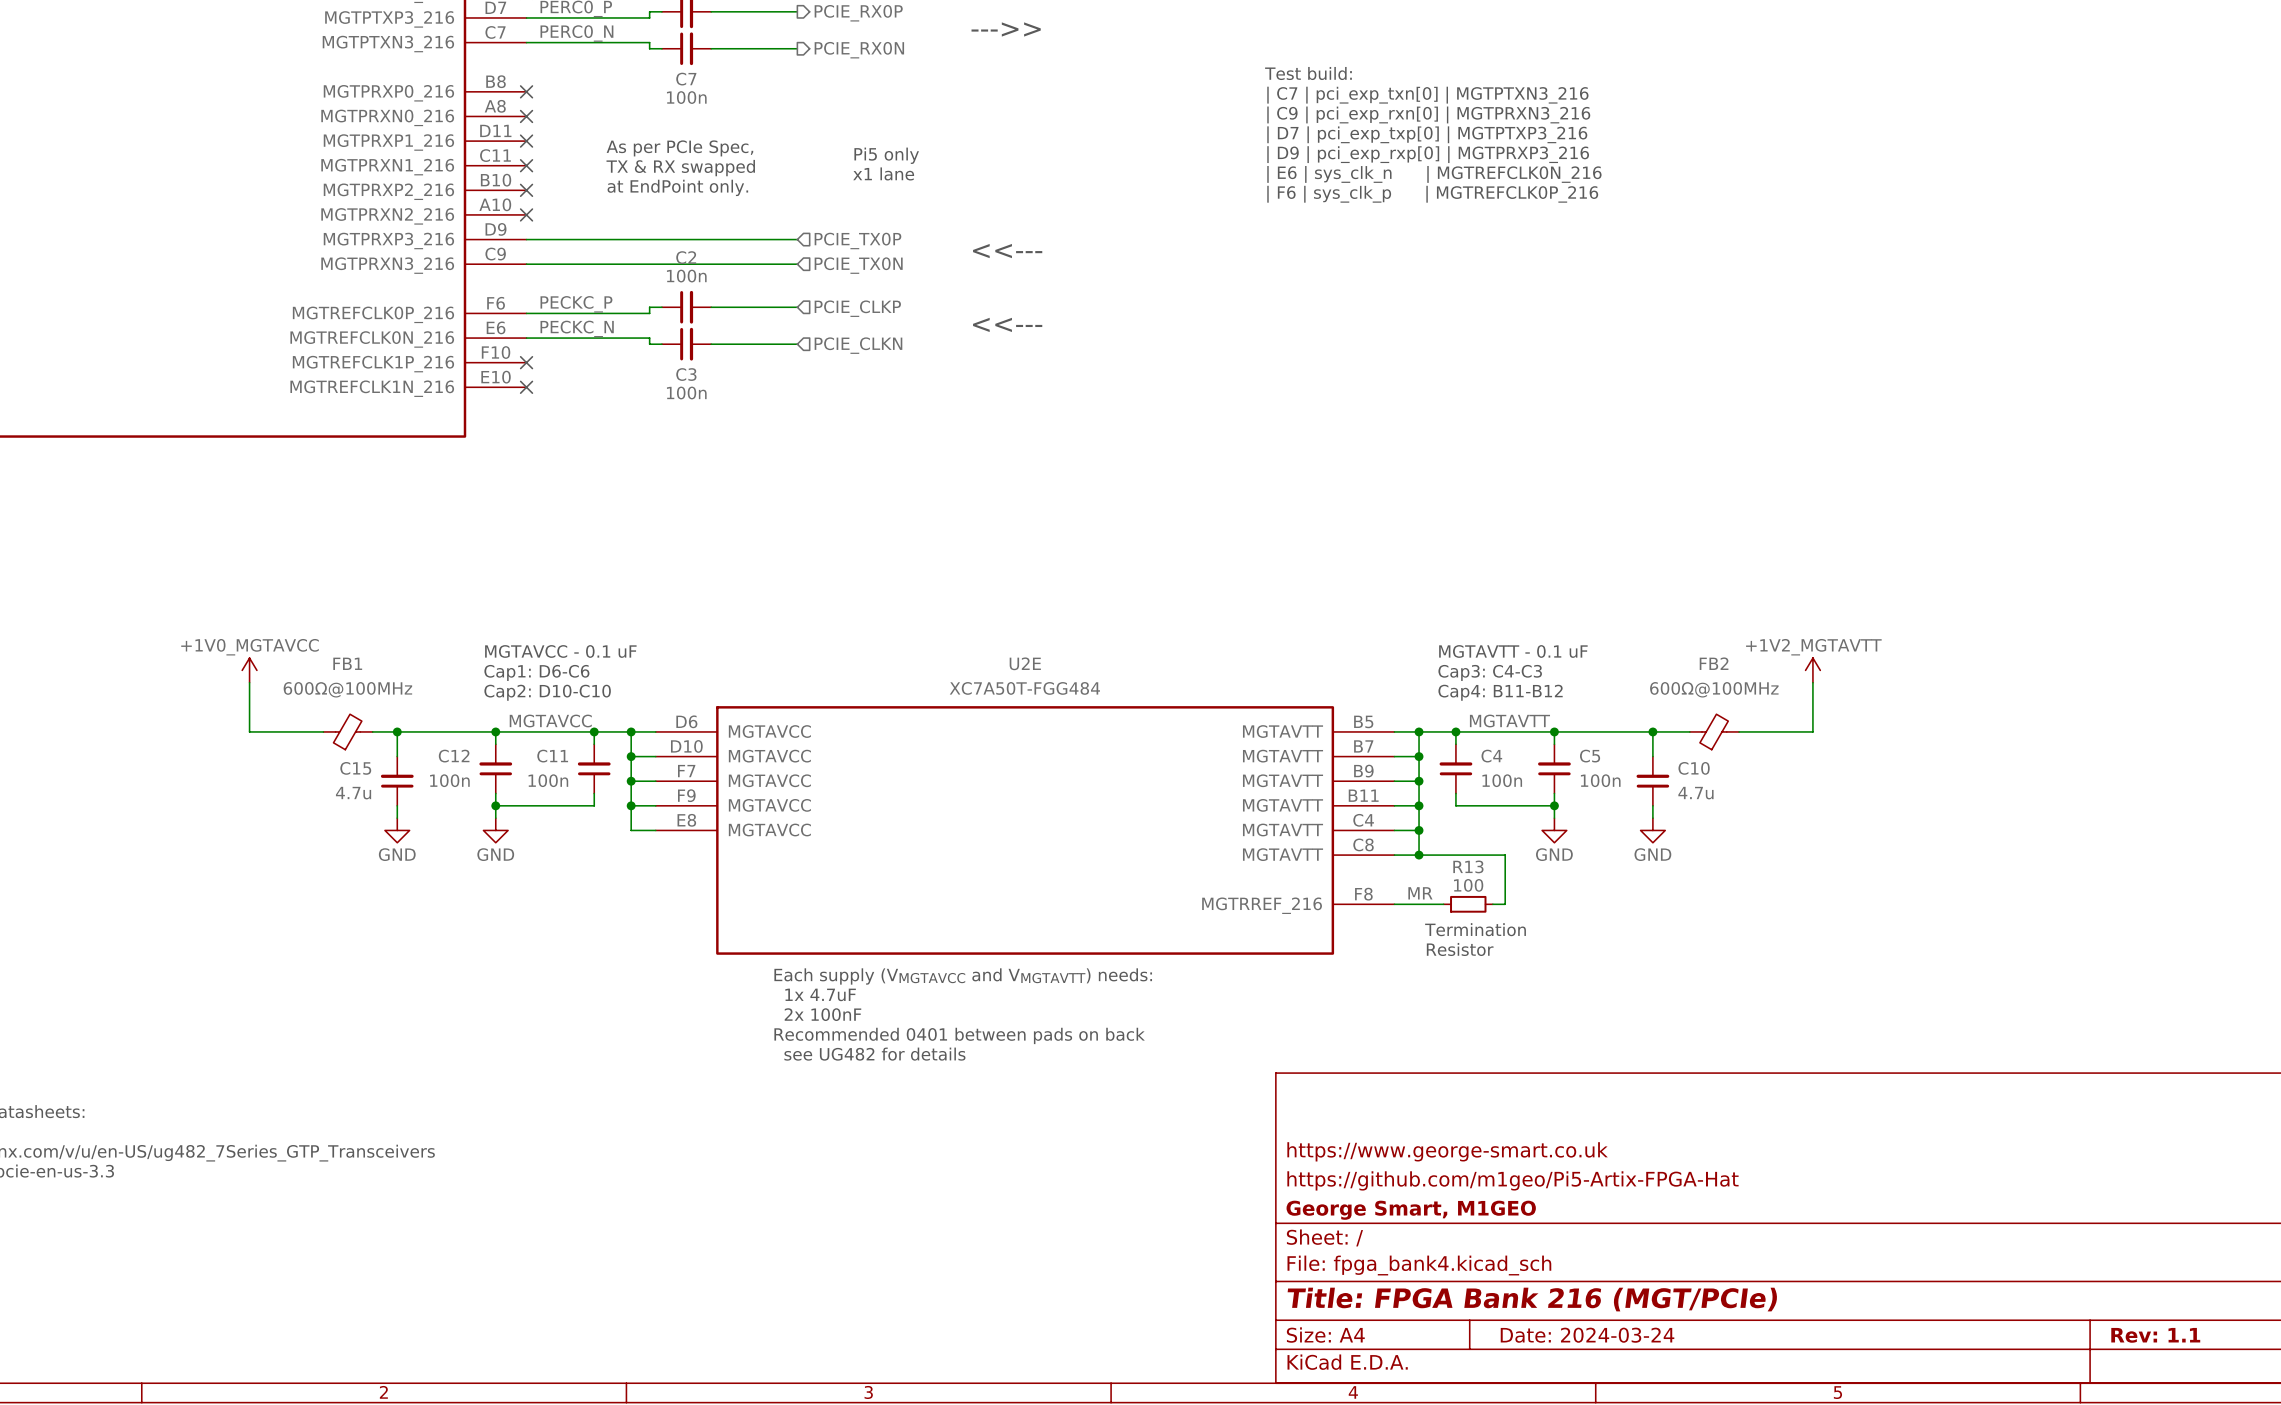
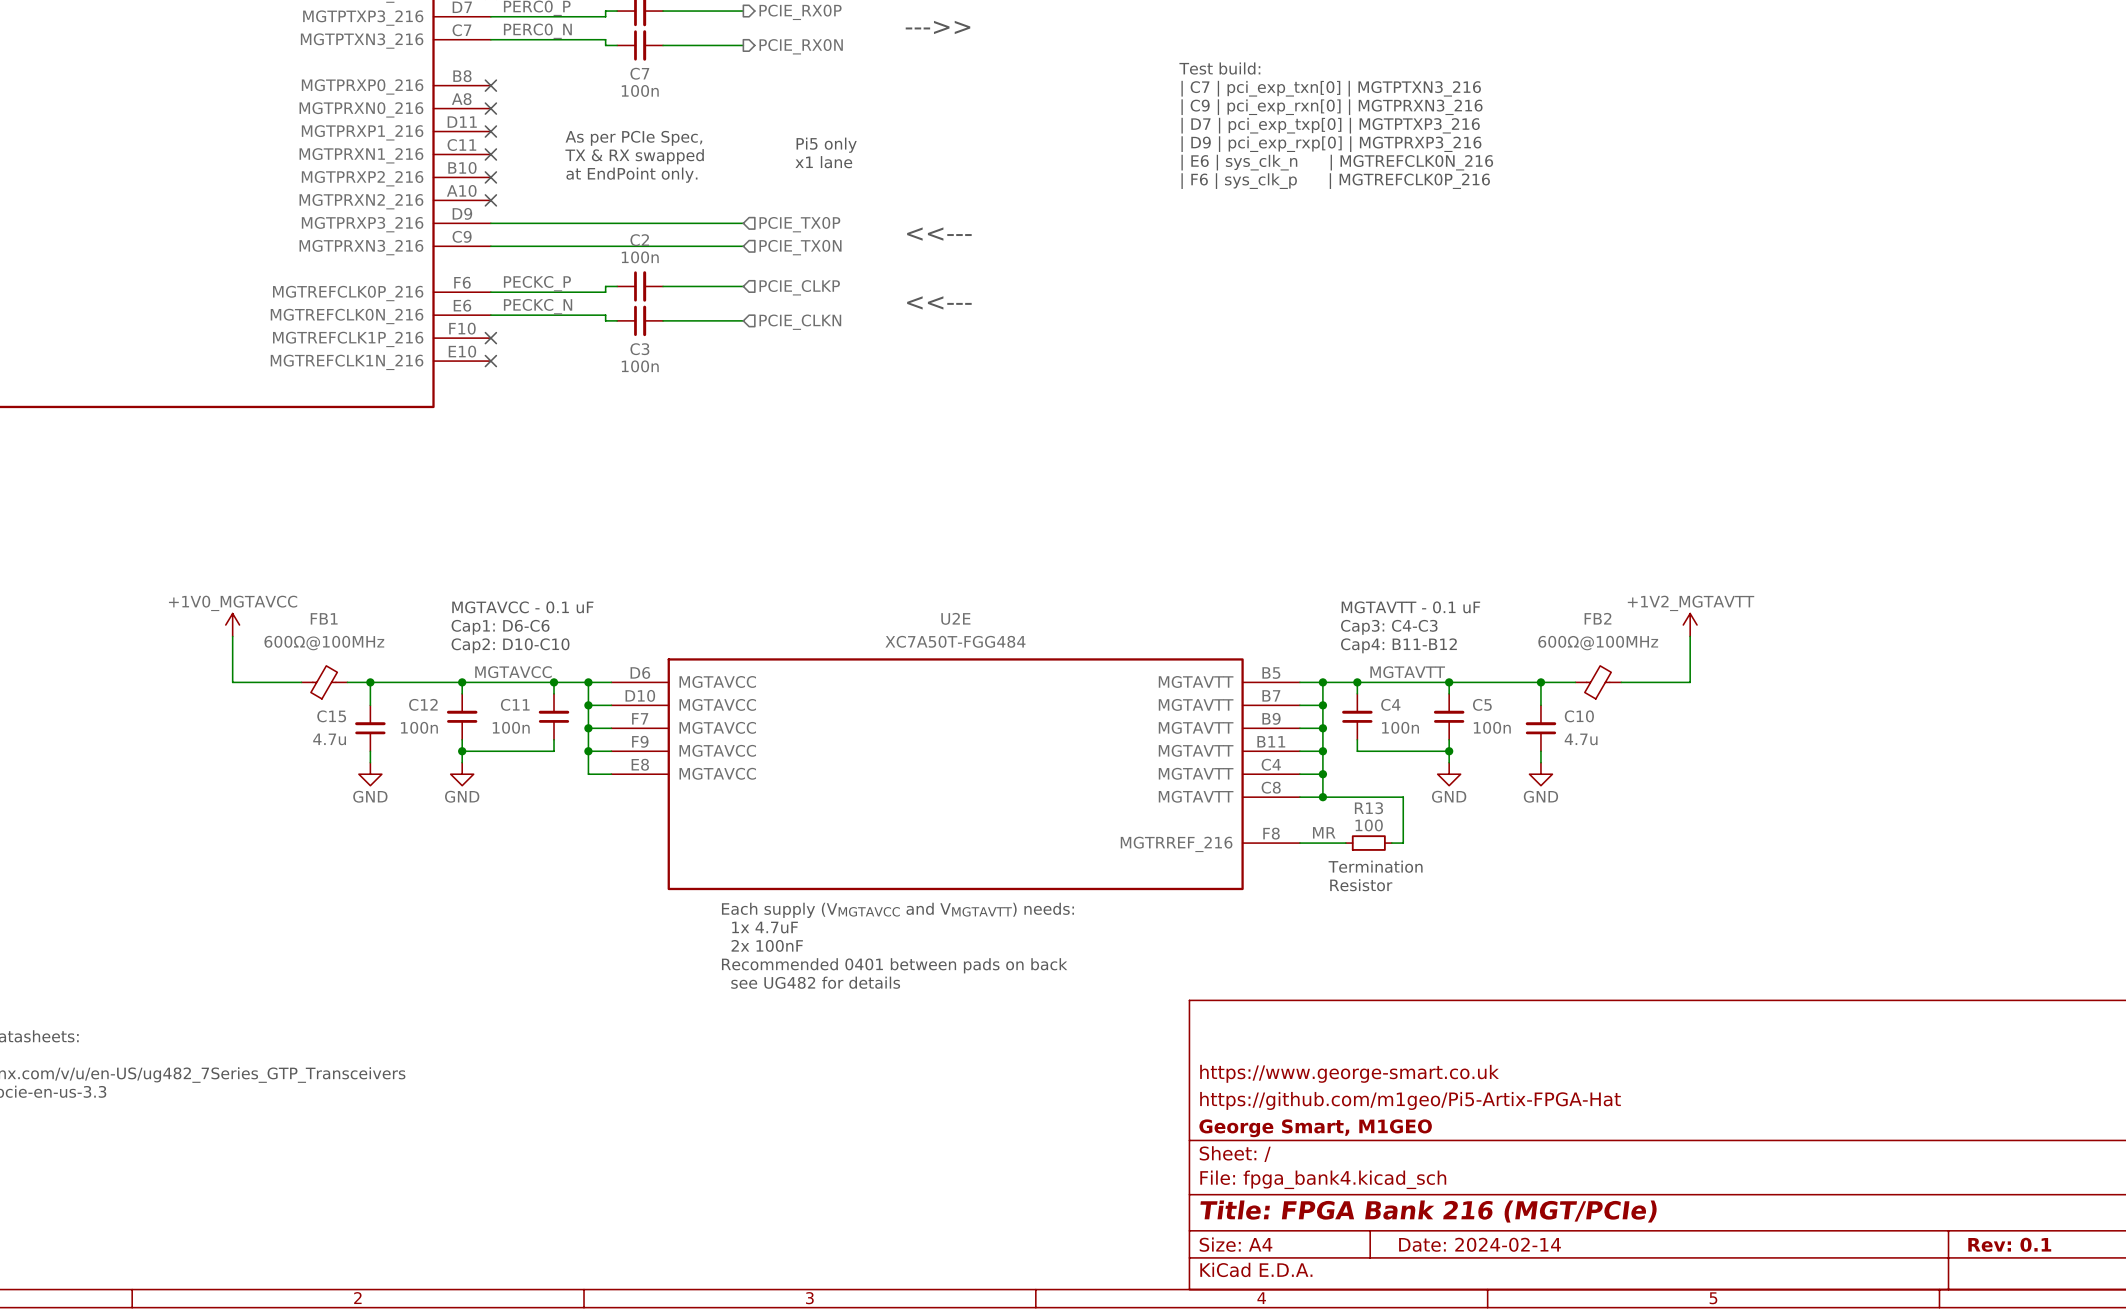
title block: Date: 2024-03-24 (1587, 1335) -> Date: 2024-02-14 (1480, 1244)
title block: Rev: 1.1 (2155, 1335) -> Rev: 0.1 (2009, 1244)

